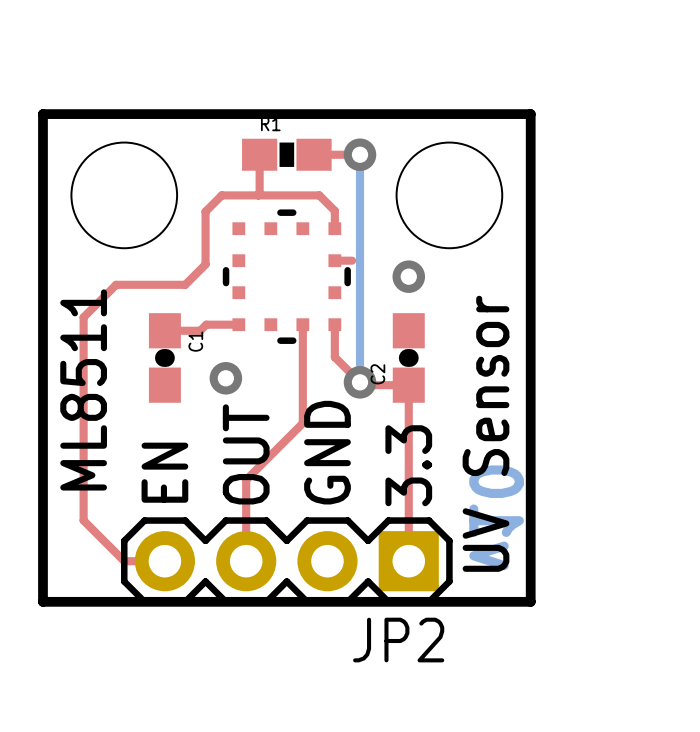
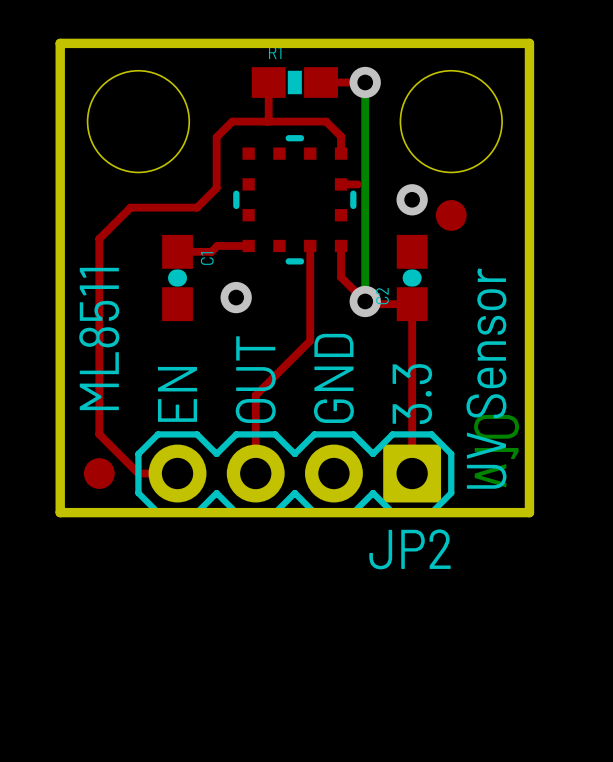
part: none -> (451, 215)
part: none -> (99, 473)

